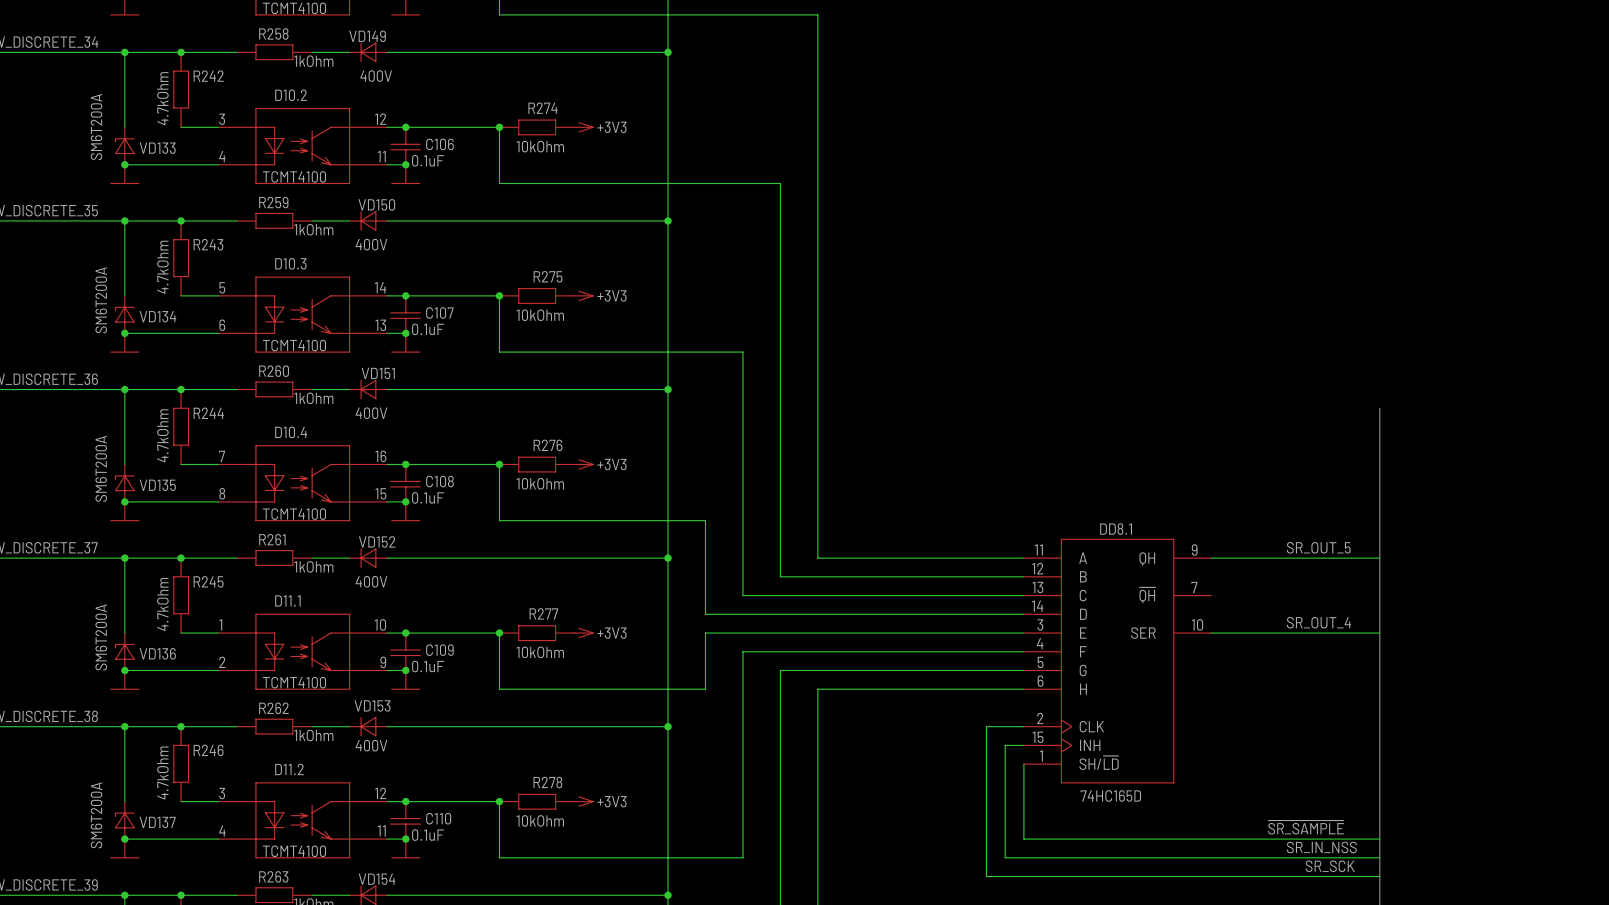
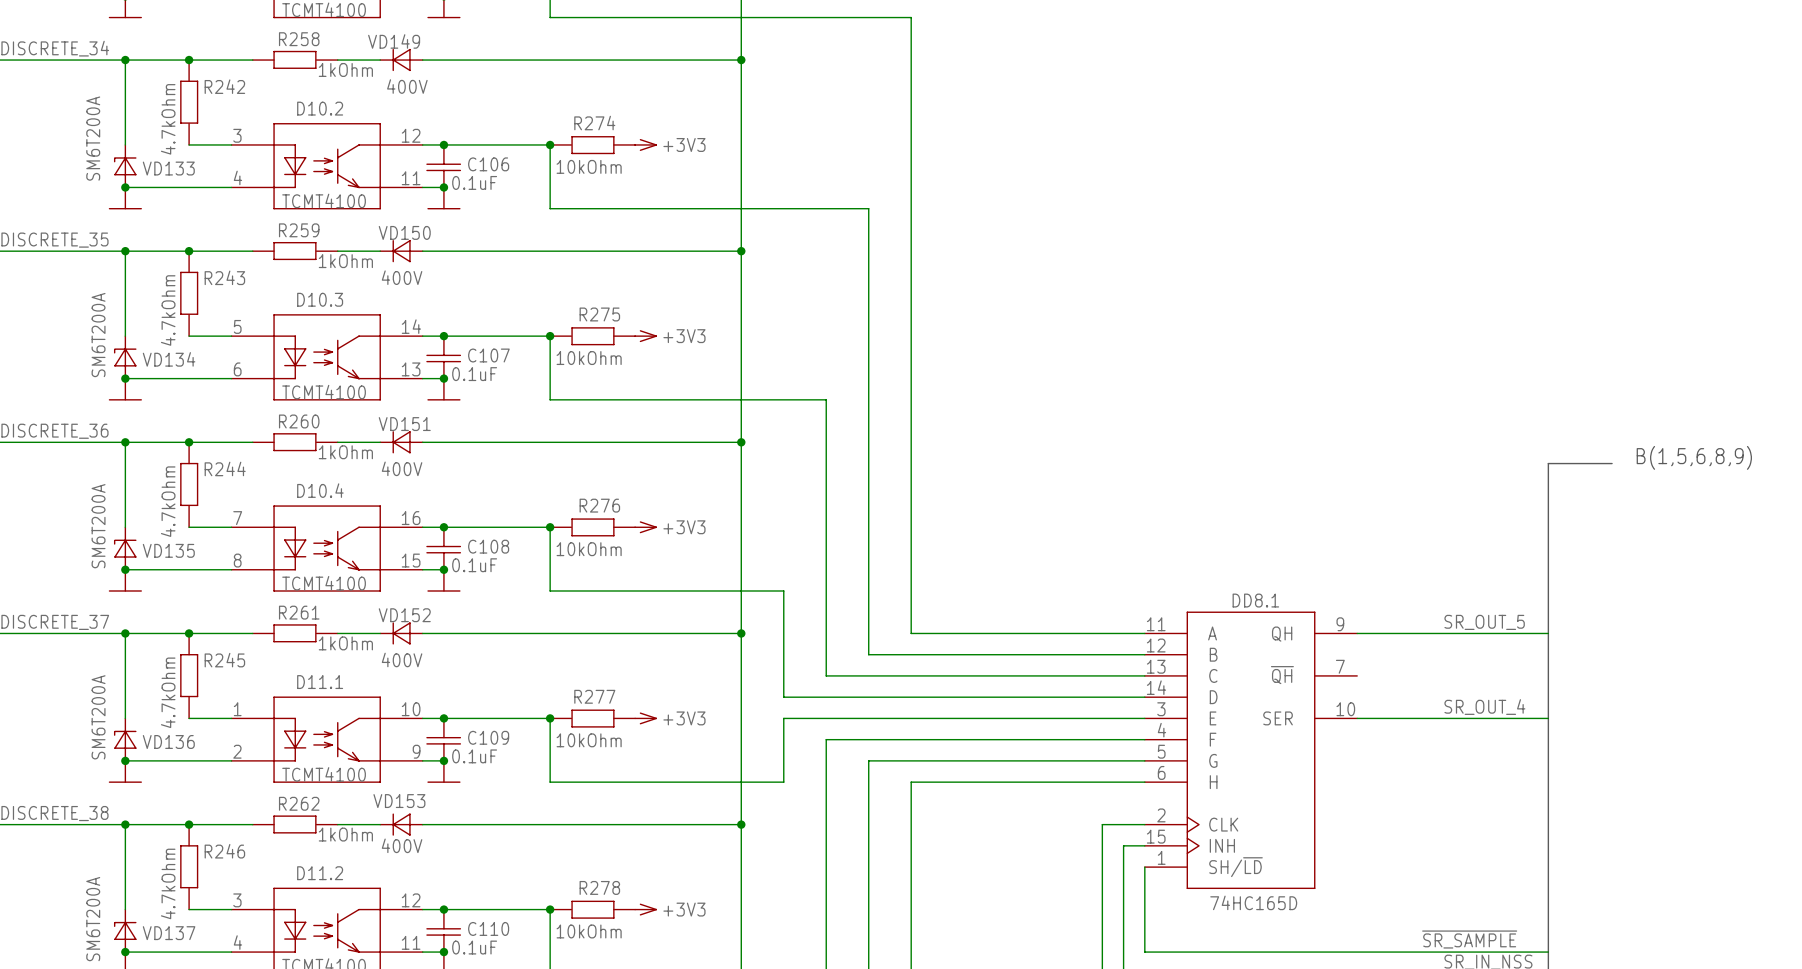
text: none -> B(1,5,6,8,9) (1694, 457)
bus: none -> (1548, 463) (1612, 463)

